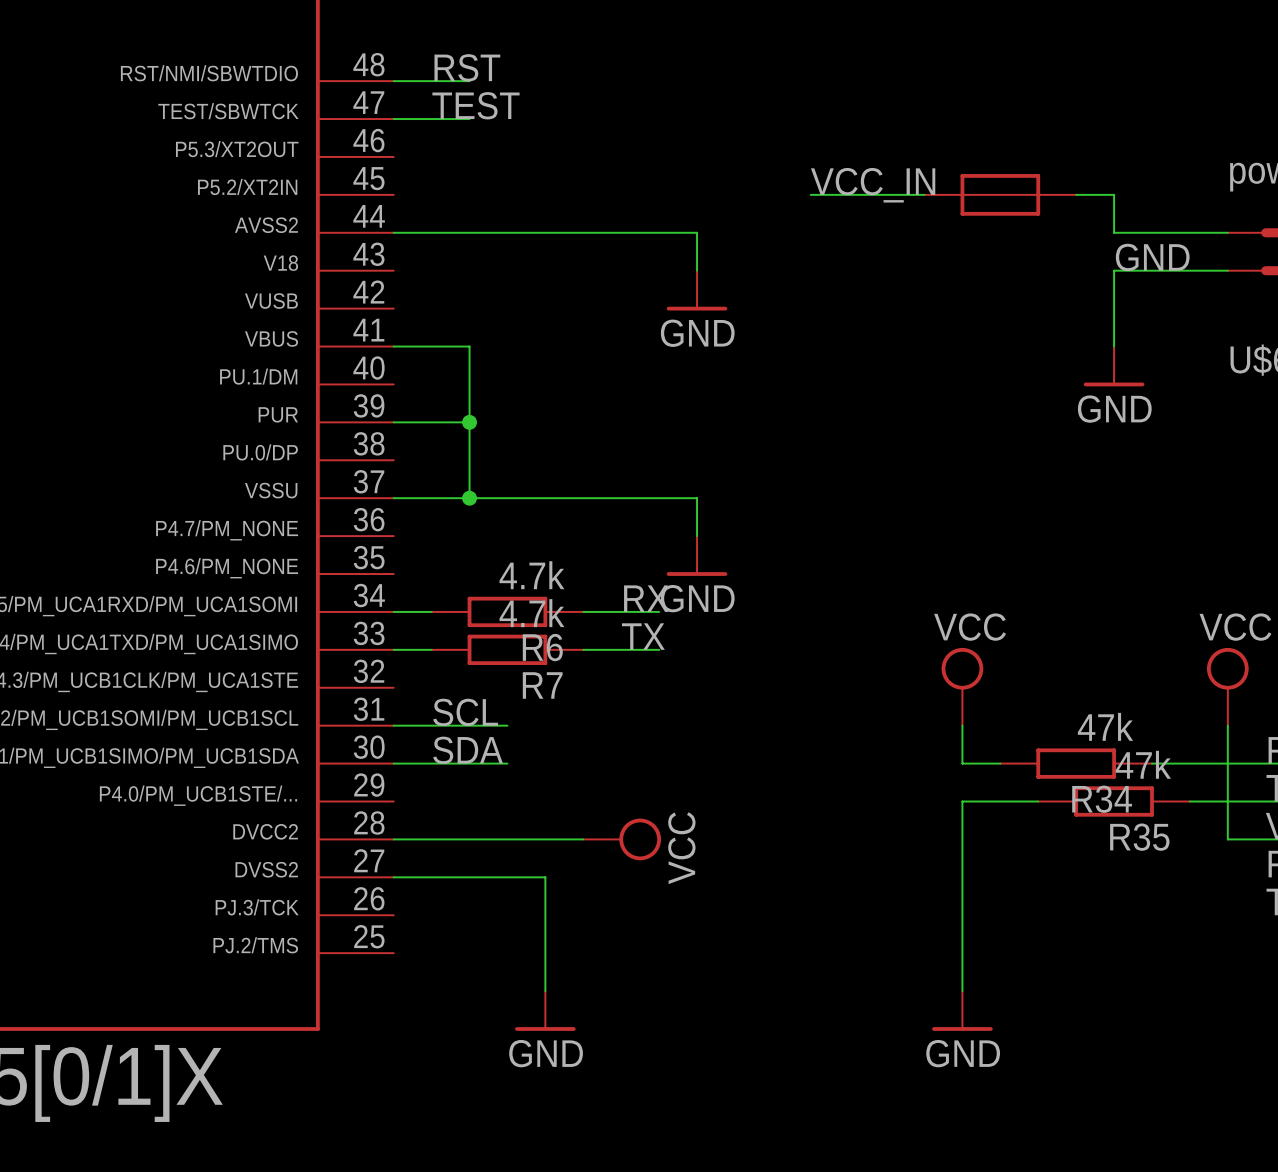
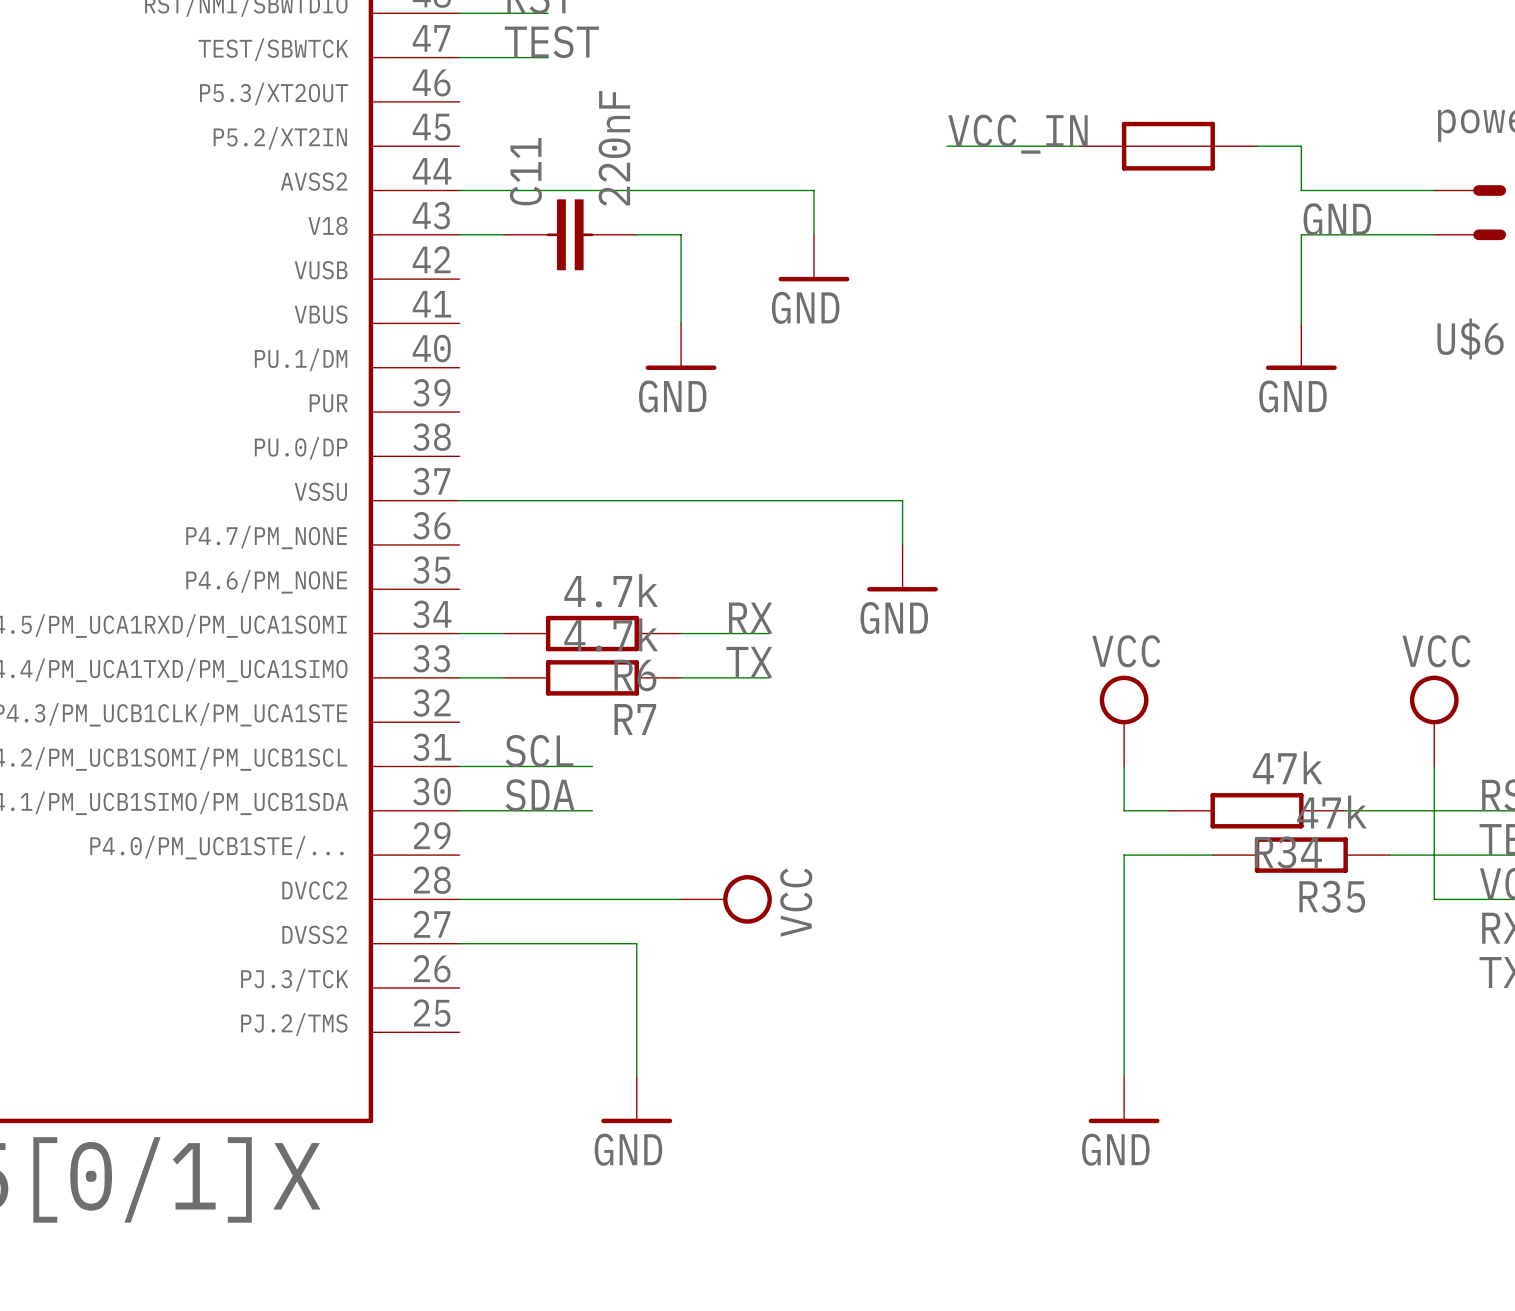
wire: none -> (459, 234) (503, 234)
C11: none -> 220nF (570, 234)
wire: none -> (636, 234) (681, 234) (681, 323)
wire: (393, 346) (469, 346) (469, 498) -> none
power symbol: none -> GND (681, 346)
wire: (393, 422) (469, 422) -> none
junction: (469, 422) -> none
junction: (469, 498) -> none
wire: (697, 498) (697, 536) -> (813, 500) (902, 500) (902, 544)
power symbol position: GND (697, 556) -> GND (902, 568)

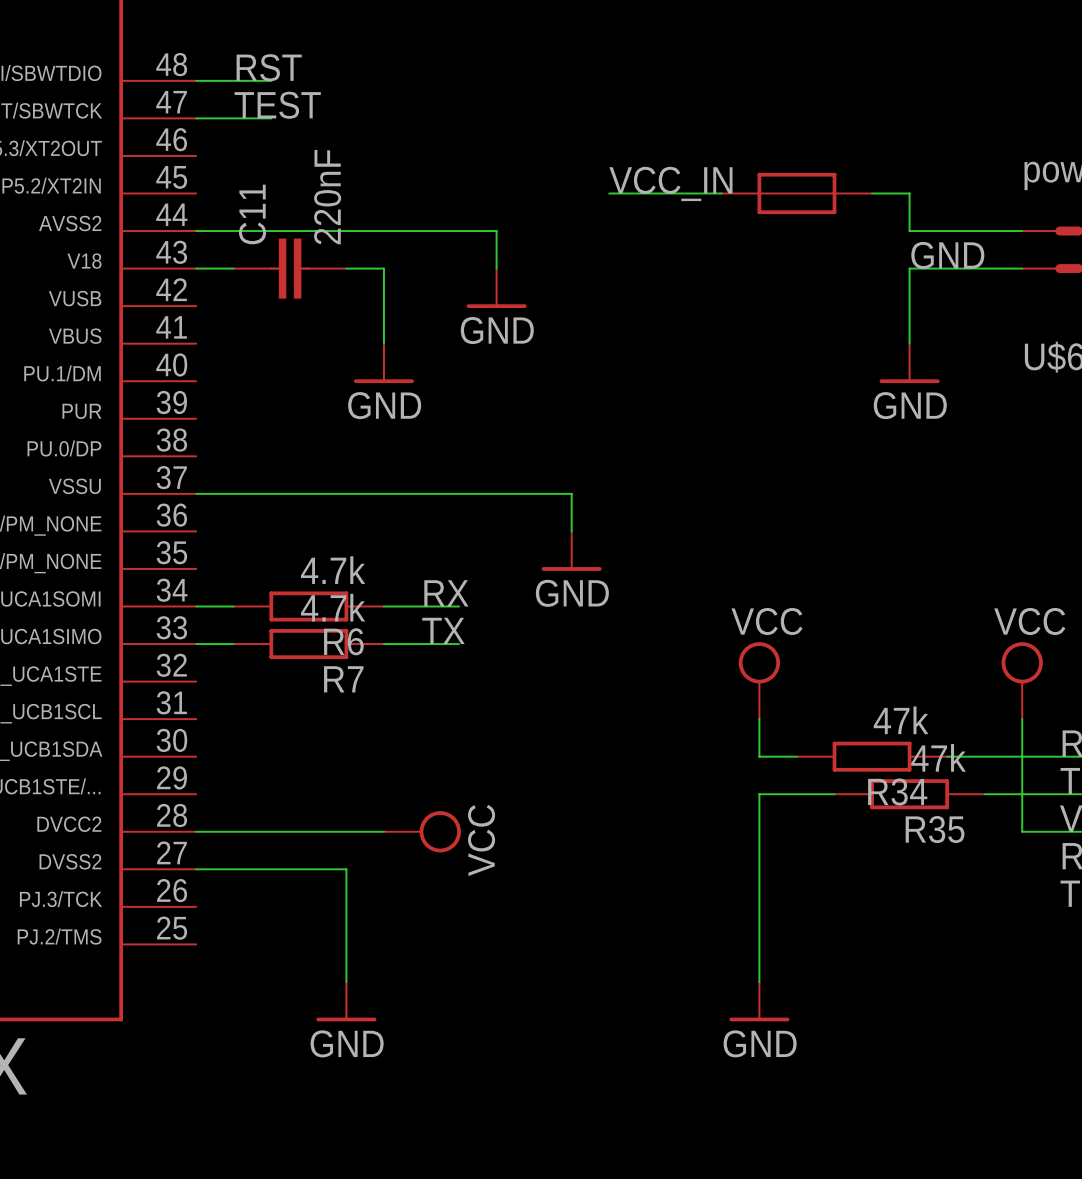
label: SCL (539, 750) -> none
wire: (459, 766) (592, 766) -> none
label: SDA (540, 795) -> none
wire: (459, 810) (592, 810) -> none

